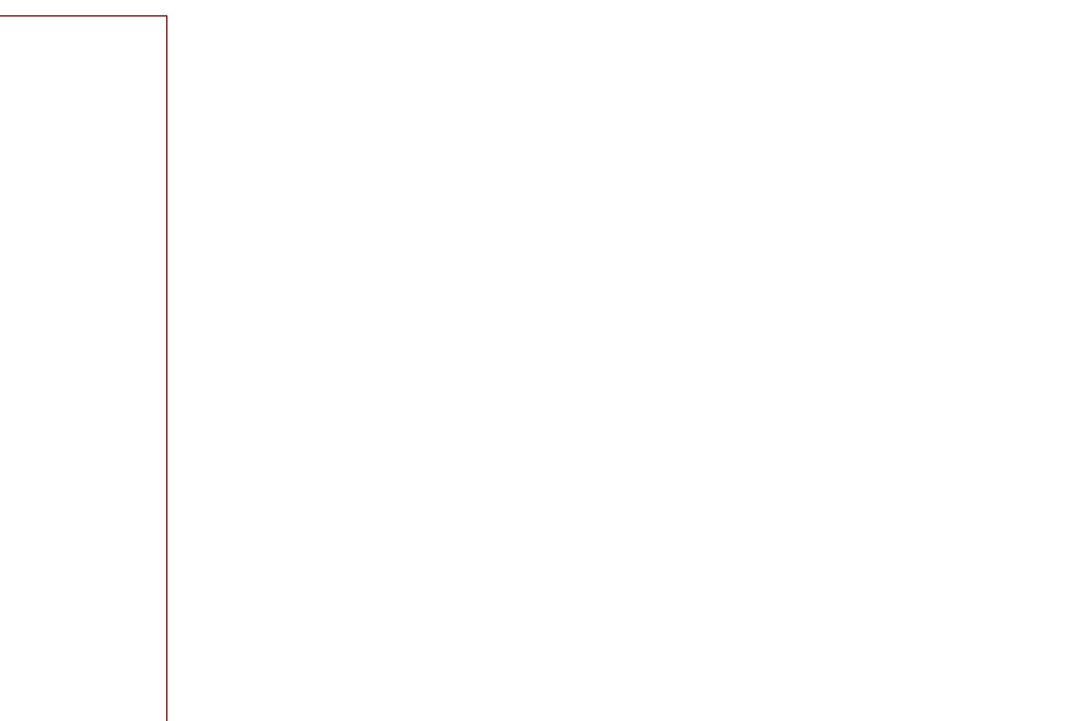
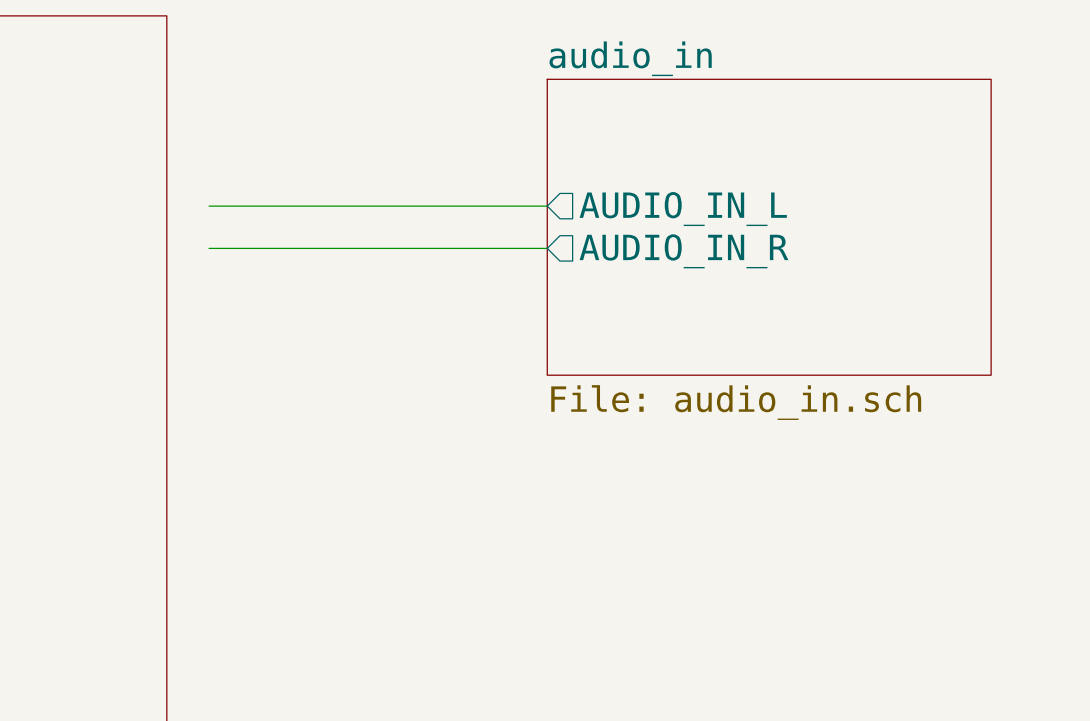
wire: none -> (209, 206) (547, 206)
sheet pin: none -> AUDIO_IN_L (683, 209)
sheet audio_in: none -> File: audio_in.sch (769, 227)
wire: none -> (209, 248) (547, 248)
sheet pin: none -> AUDIO_IN_R (684, 251)

